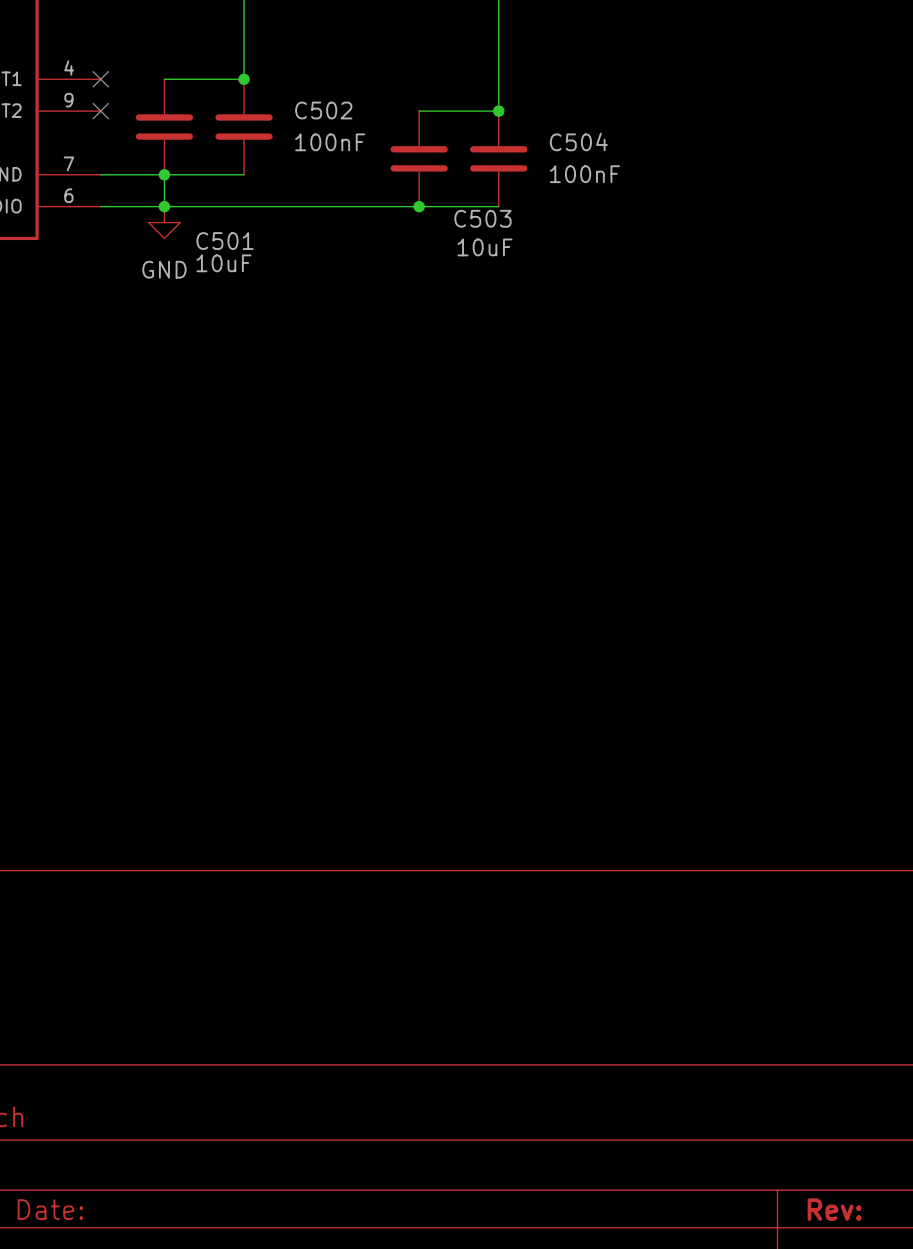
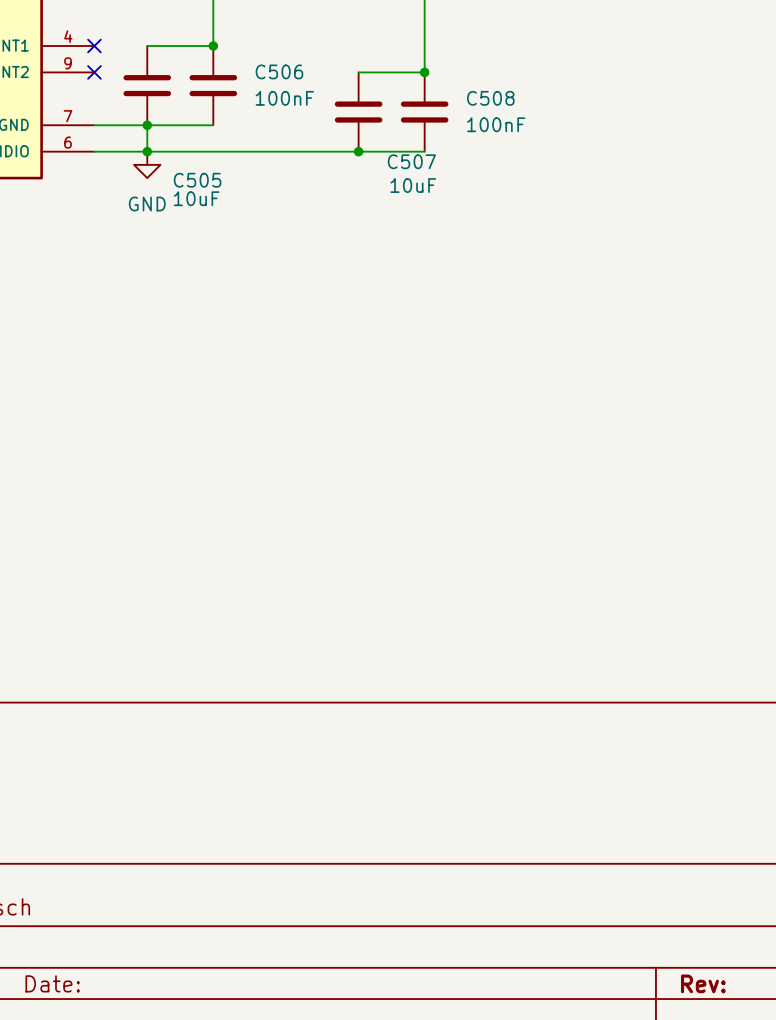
C502 name: C502 (323, 110) -> C506 (279, 71)
C504 name: C504 (578, 141) -> C508 (490, 98)
C503 name: C503 (482, 218) -> C507 (411, 161)
C501 name: C501 (225, 241) -> C505 (197, 180)

